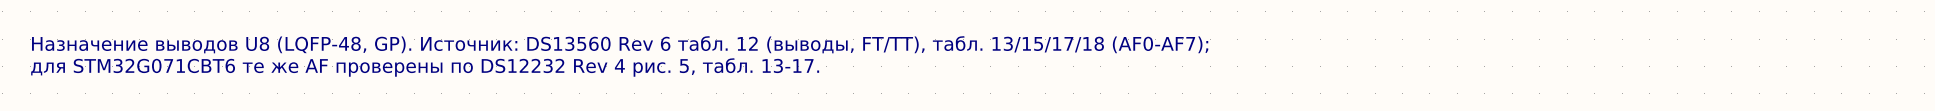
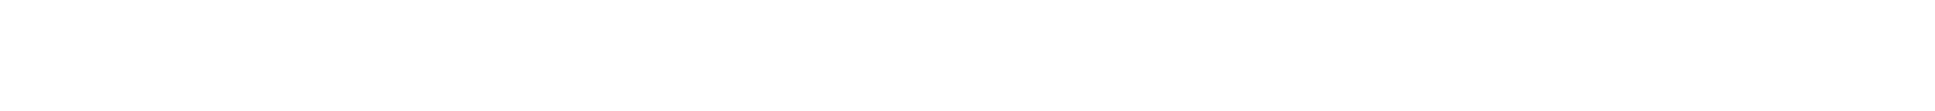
text: Назначение выводов U8 (LQFP-48, GP). Источник: DS13560 Rev 6 табл. 12 (выводы, FT/TT), табл. 13/15/17/18 (AF0-AF7); (620, 44) -> none
text: для STM32G071CBT6 те же AF проверены по DS12232 Rev 4 рис. 5, табл. 13-17. (425, 67) -> none

